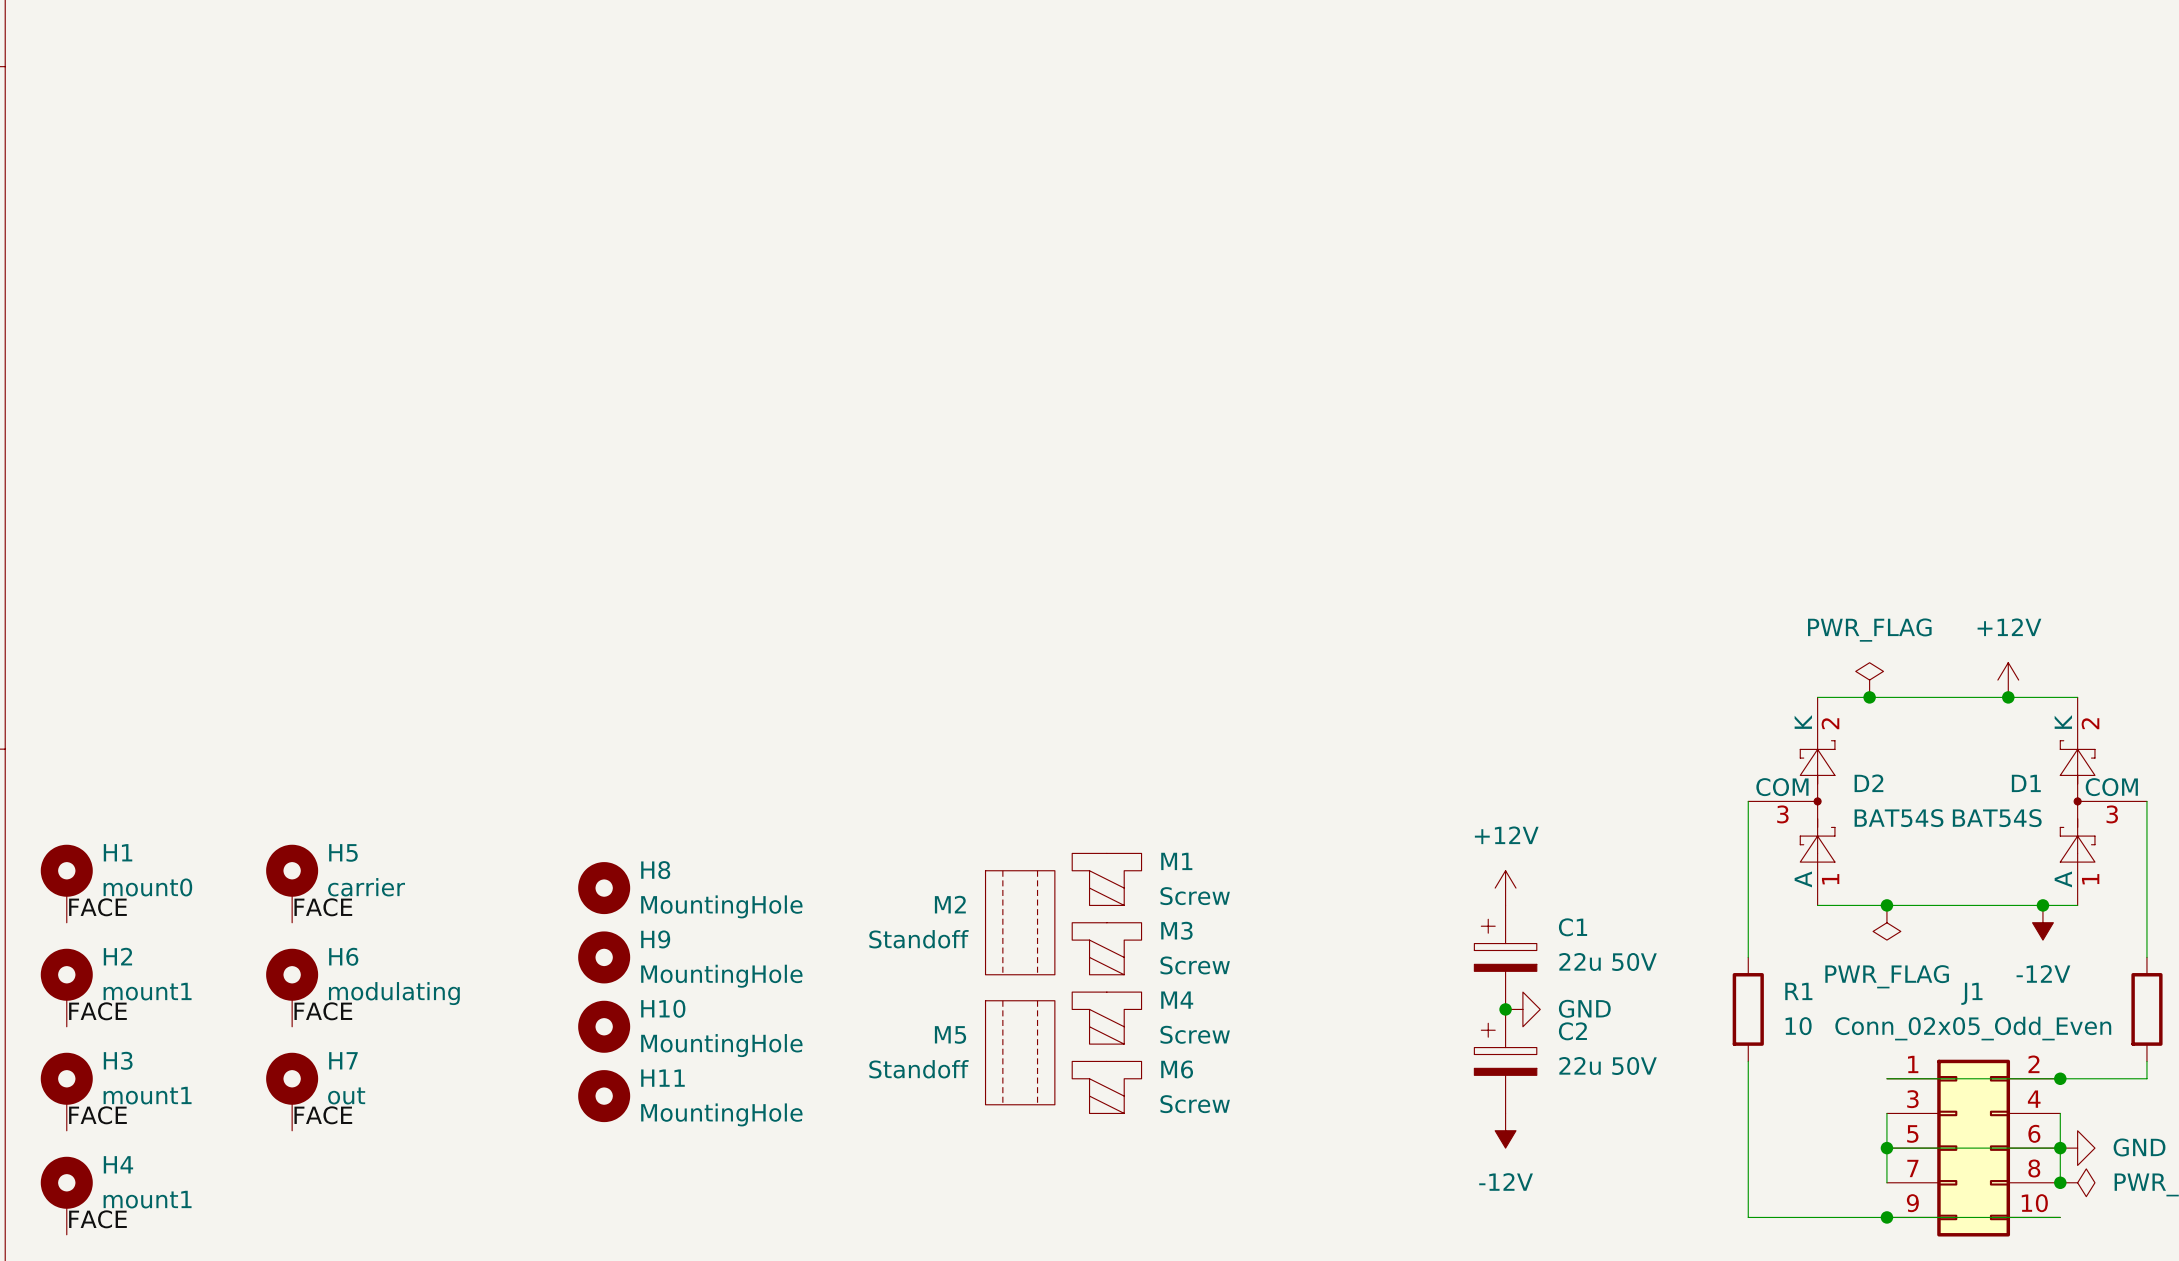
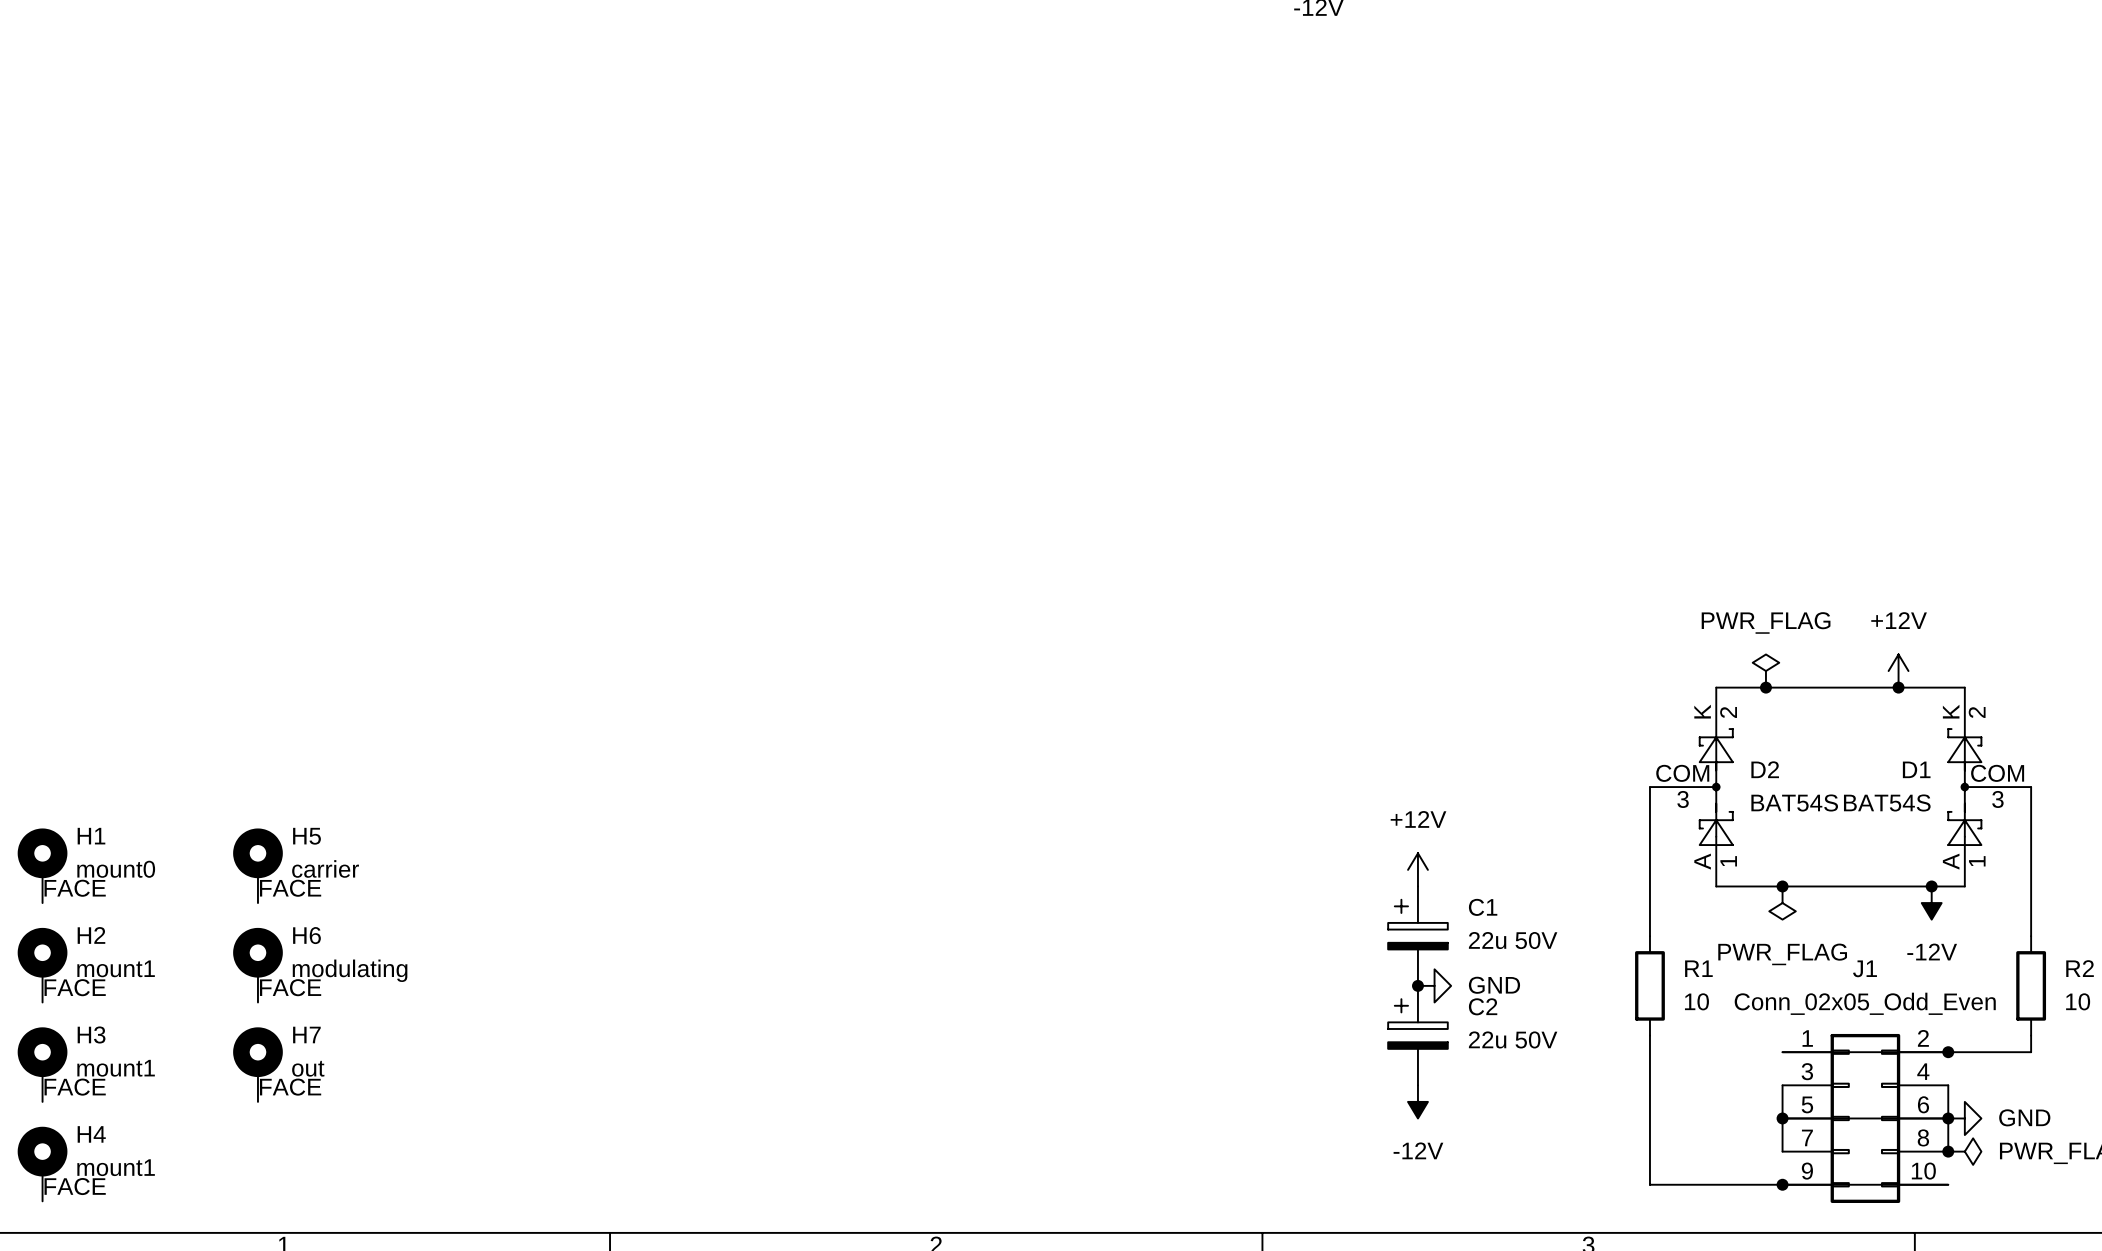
M1: Screw (1106, 879) -> none
H8: MountingHole (604, 888) -> none
M2: Standoff (1020, 922) -> none
M3: Screw (1106, 948) -> none
H9: MountingHole (604, 957) -> none
M4: Screw (1106, 1018) -> none
H10: MountingHole (604, 1026) -> none
M5: Standoff (1020, 1052) -> none
M6: Screw (1106, 1087) -> none
H11: MountingHole (604, 1096) -> none

